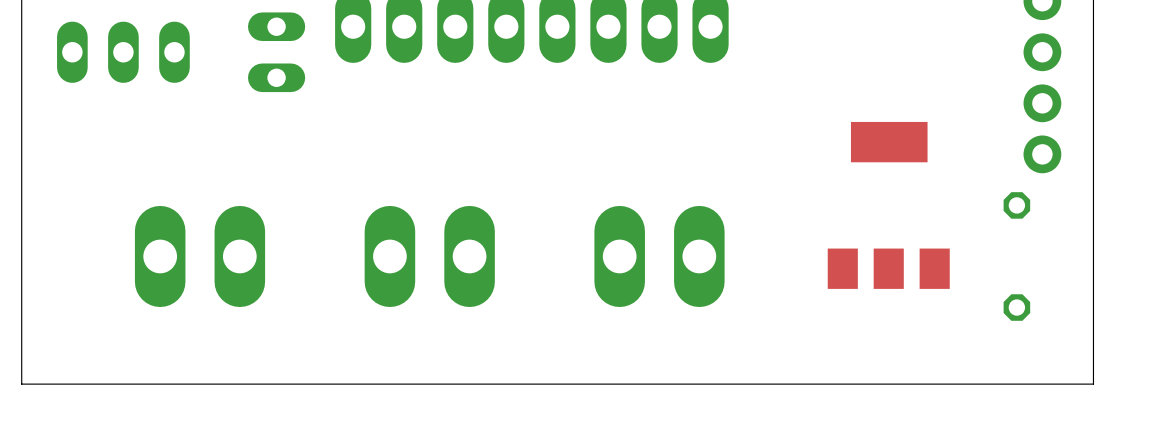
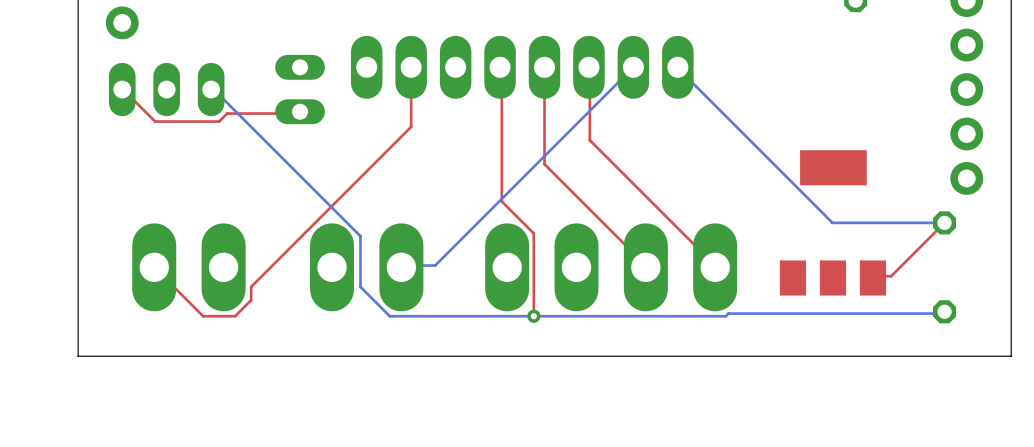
top track: none -> (411, 67) (411, 126) (251, 286) (251, 300) (235, 316) (203, 316) (154, 267)
top track: none -> (500, 67) (501, 68) (501, 201) (533, 233) (533, 316)
top track: none -> (544, 67) (544, 164) (645, 267)
top track: none -> (588, 67) (589, 140) (715, 267)
bottom track: none -> (633, 67) (435, 265) (403, 265) (401, 267)
bottom track: none -> (677, 67) (832, 222) (944, 222)
top track: none -> (122, 89) (155, 121) (219, 121) (227, 113) (299, 113) (300, 111)
bottom track: none -> (211, 89) (213, 89) (360, 236) (360, 286) (389, 316) (725, 316) (728, 313) (944, 313) (944, 311)
top track: none -> (944, 222) (891, 276) (875, 276) (872, 278)
part position: (200, 256) -> (188, 267)
part: none -> (366, 267)
part: (429, 256) -> none
part: none -> (611, 267)
part: (659, 256) -> none
via: none -> (533, 316)
board edge: (1093, 358) (1093, 384) (21, 384) (21, 358) -> (1011, 356) (78, 356)

